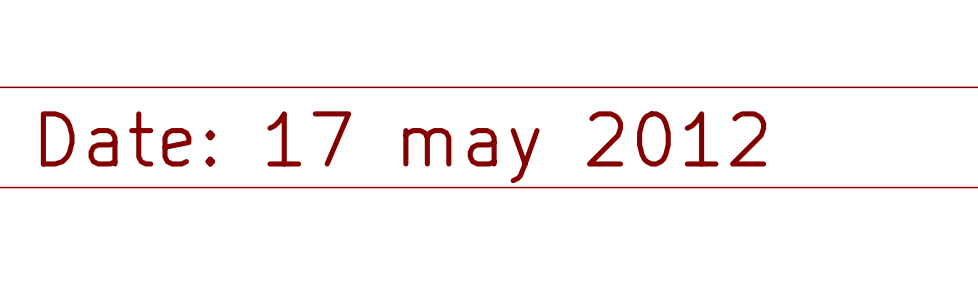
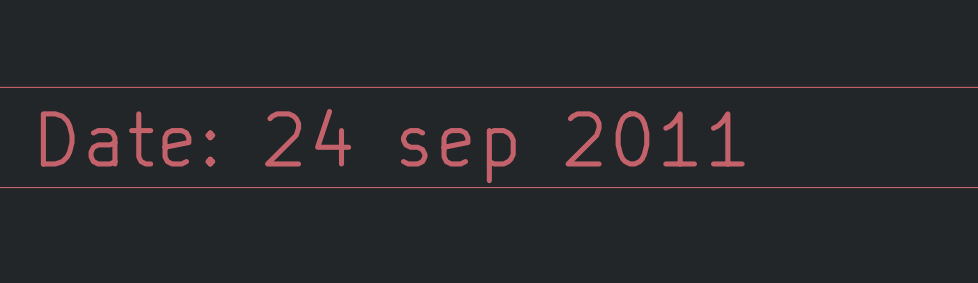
title block: Date: 17 may 2012 (403, 147) -> Date: 24 sep 2011 (392, 146)

